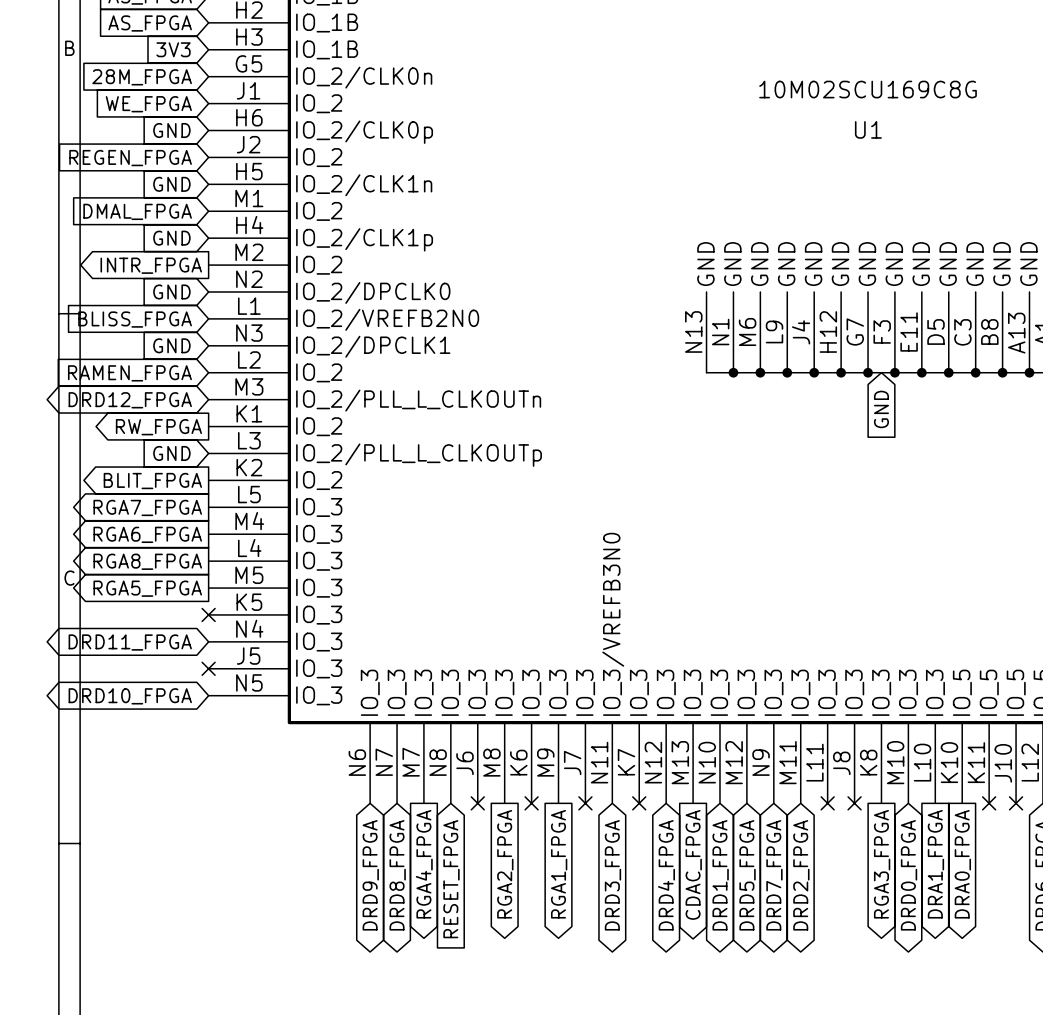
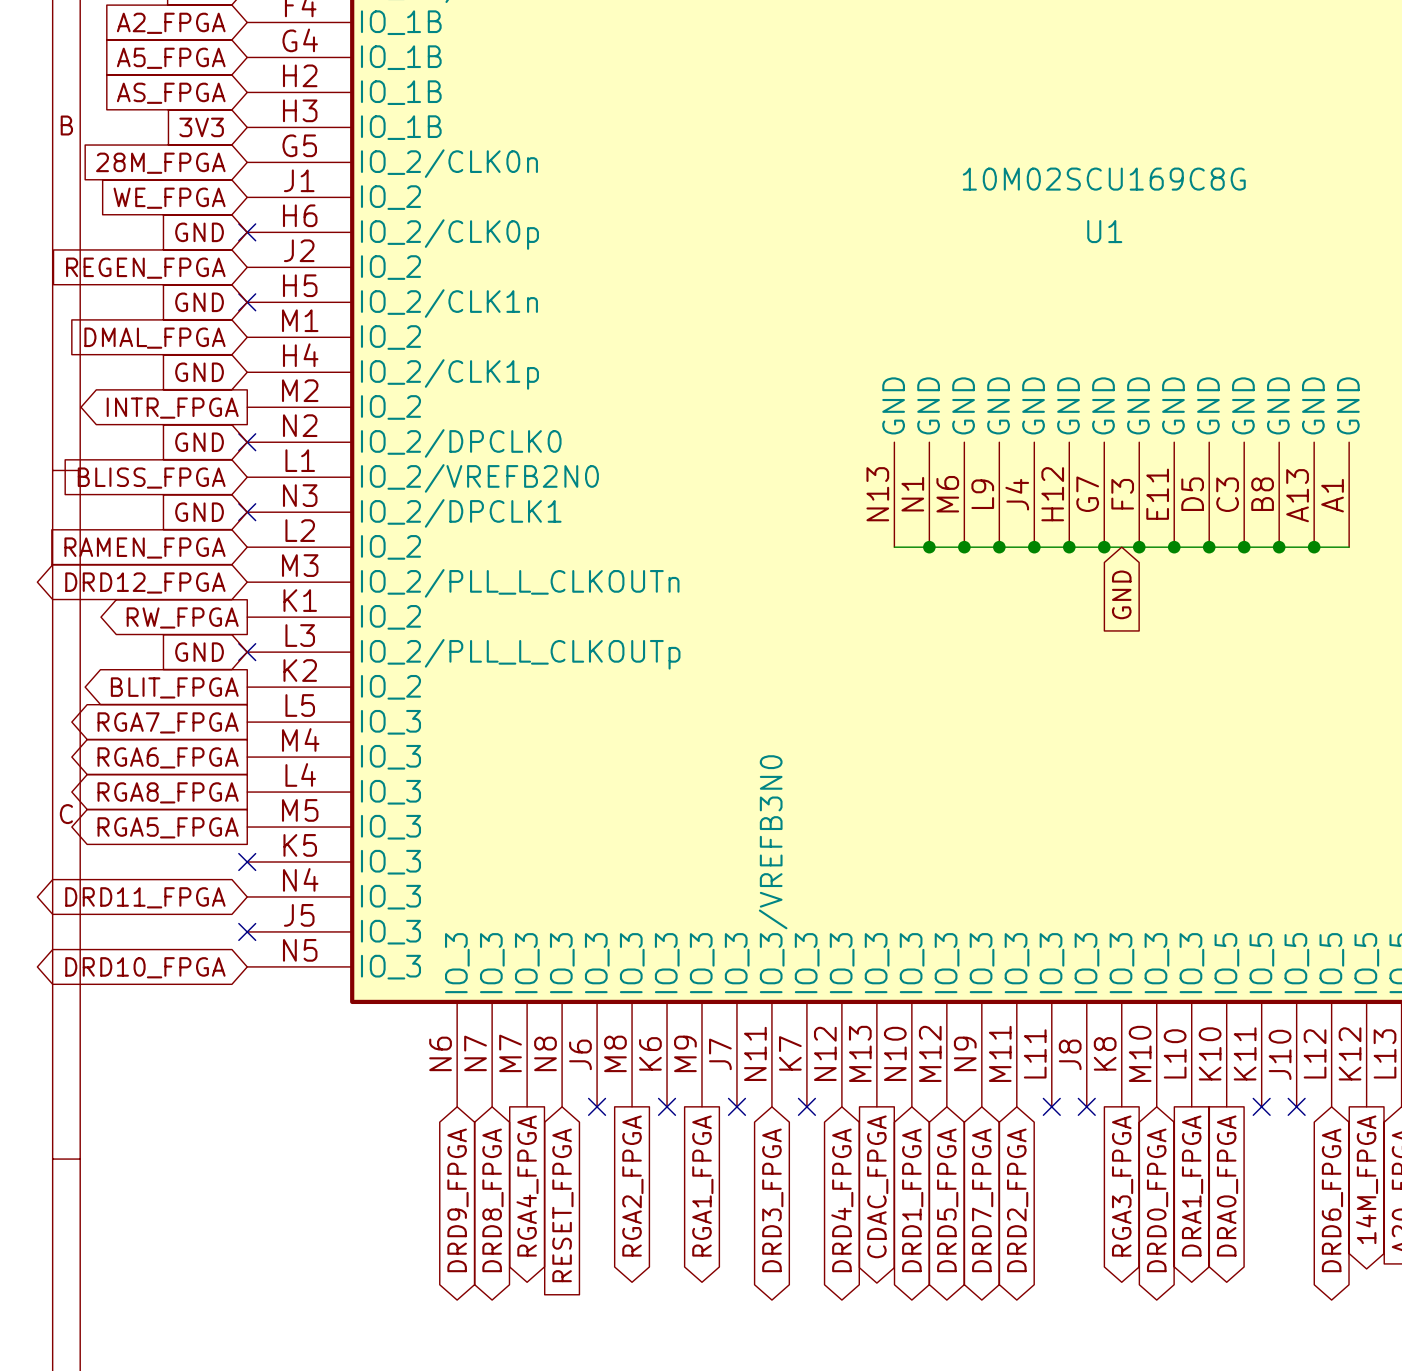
no-connect mark: none -> (247, 232)
no-connect mark: none -> (247, 302)
no-connect mark: none -> (247, 442)
no-connect mark: none -> (247, 512)
no-connect mark: none -> (247, 652)

